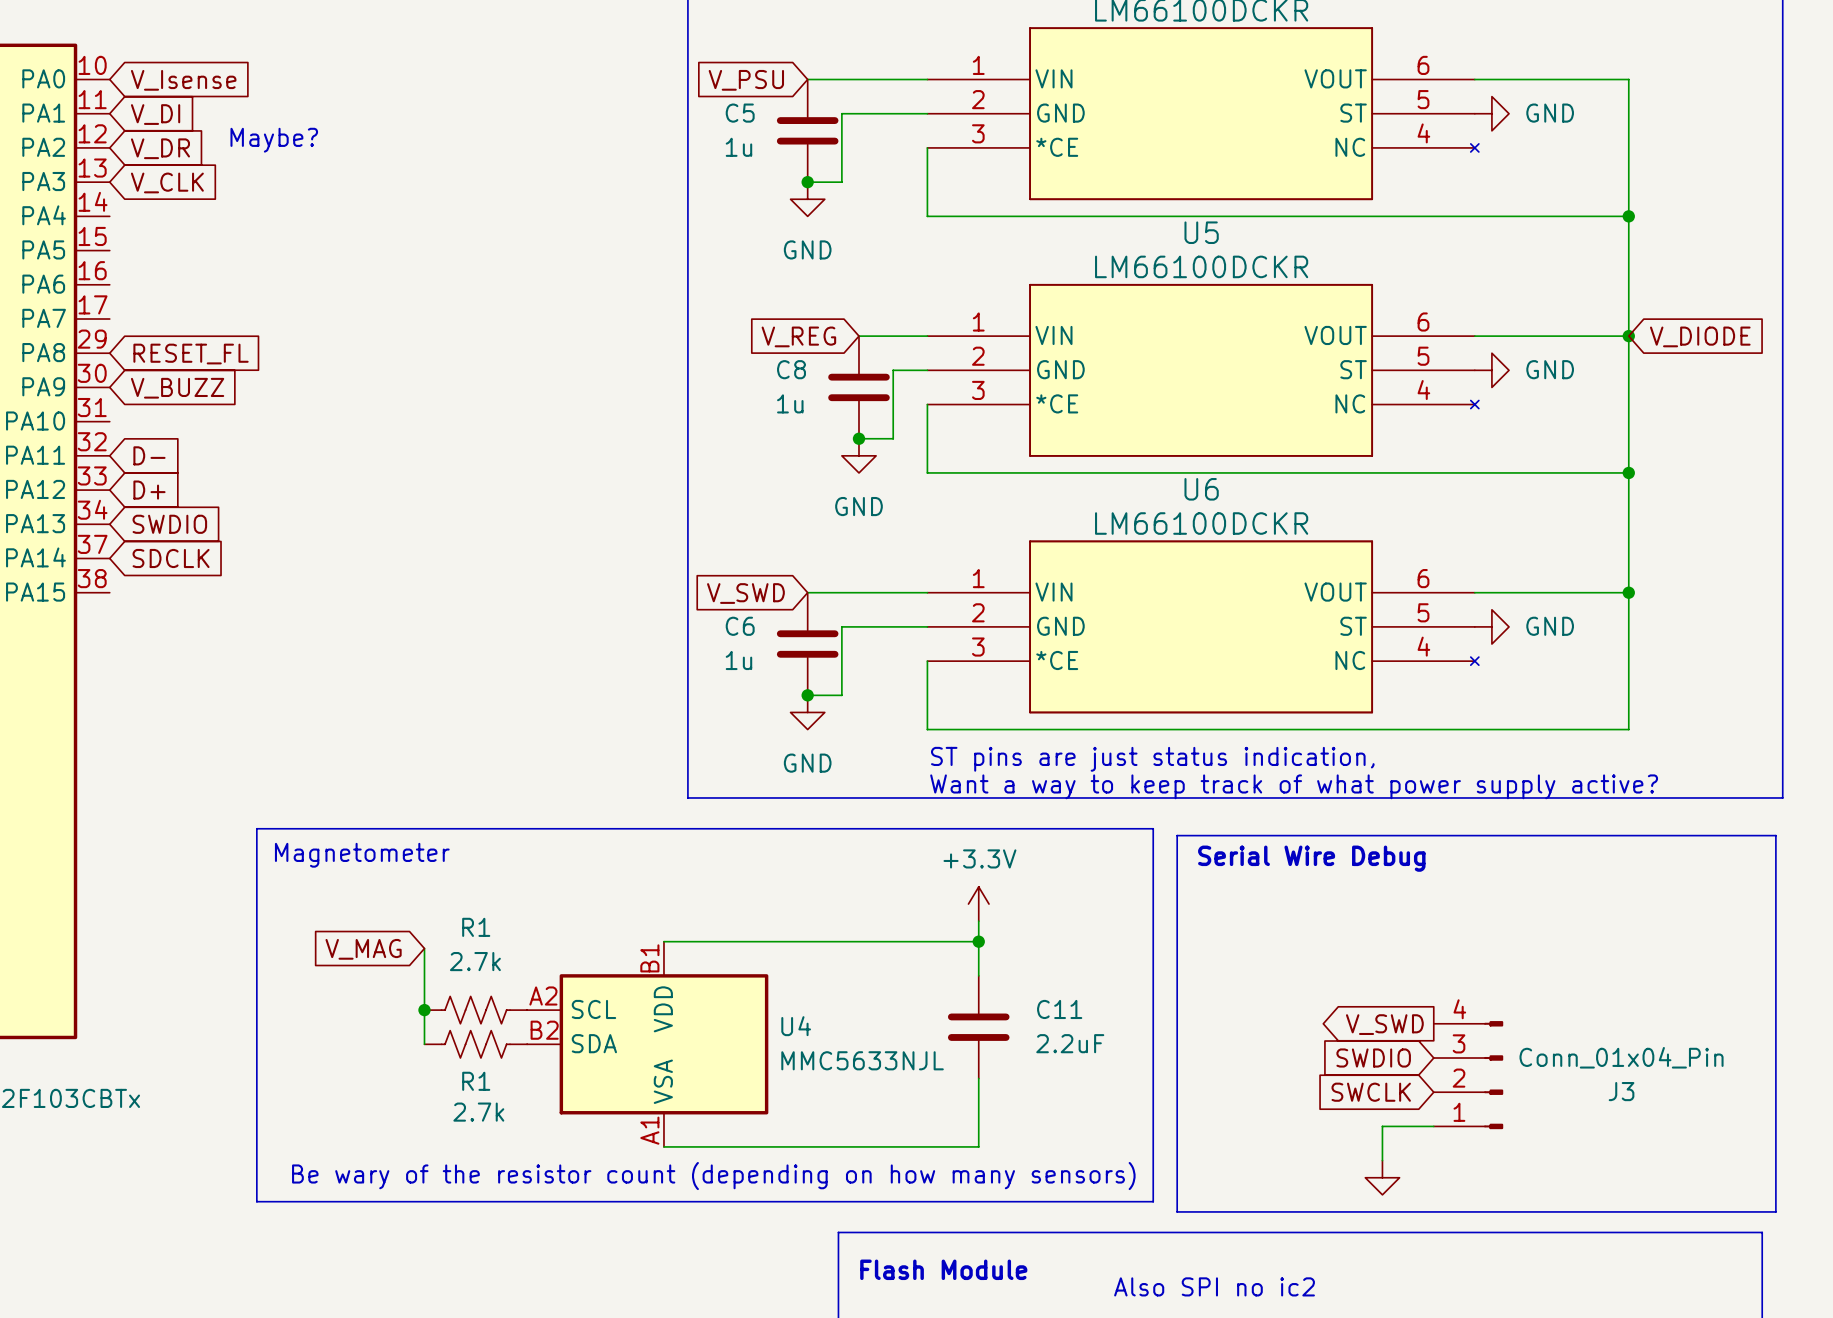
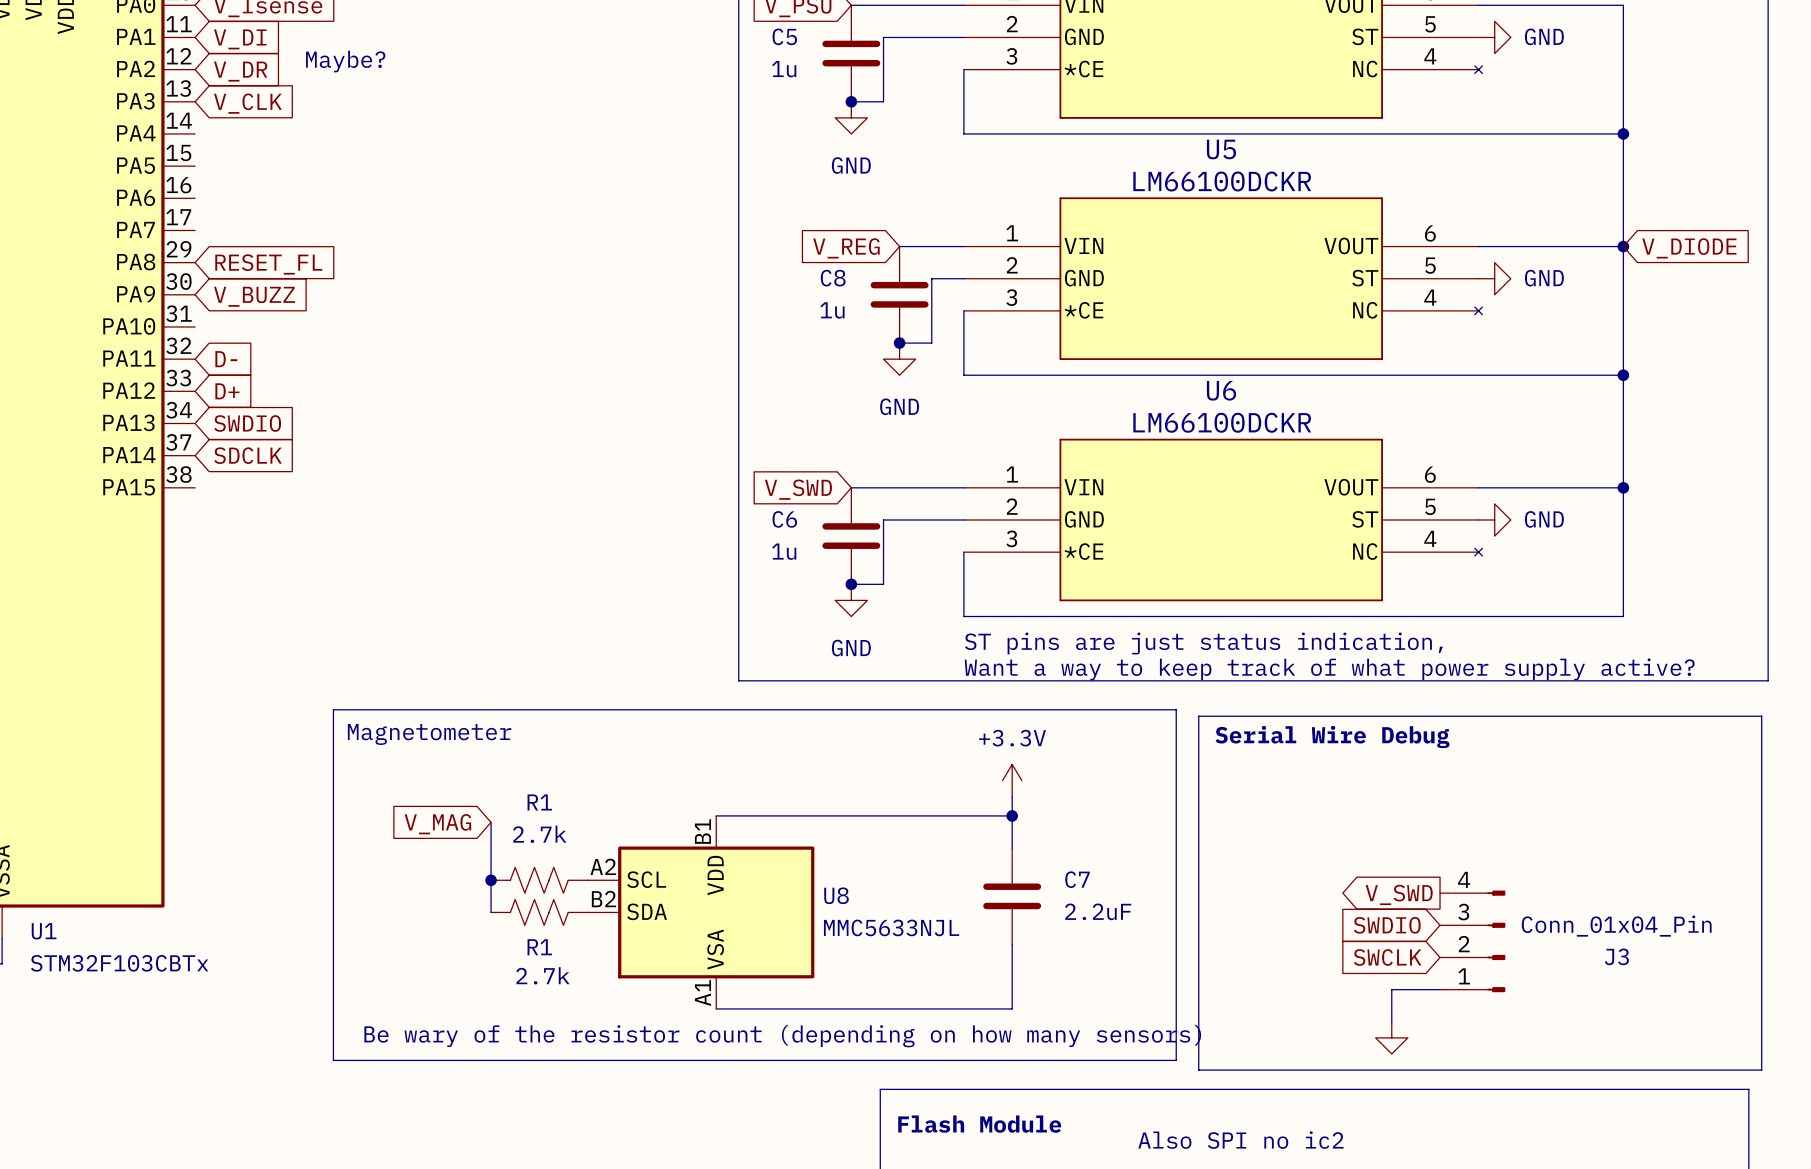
C11 name: C11 (1059, 1009) -> C7 (1077, 879)
U4 name: U4 (796, 1026) -> U8 (836, 895)

